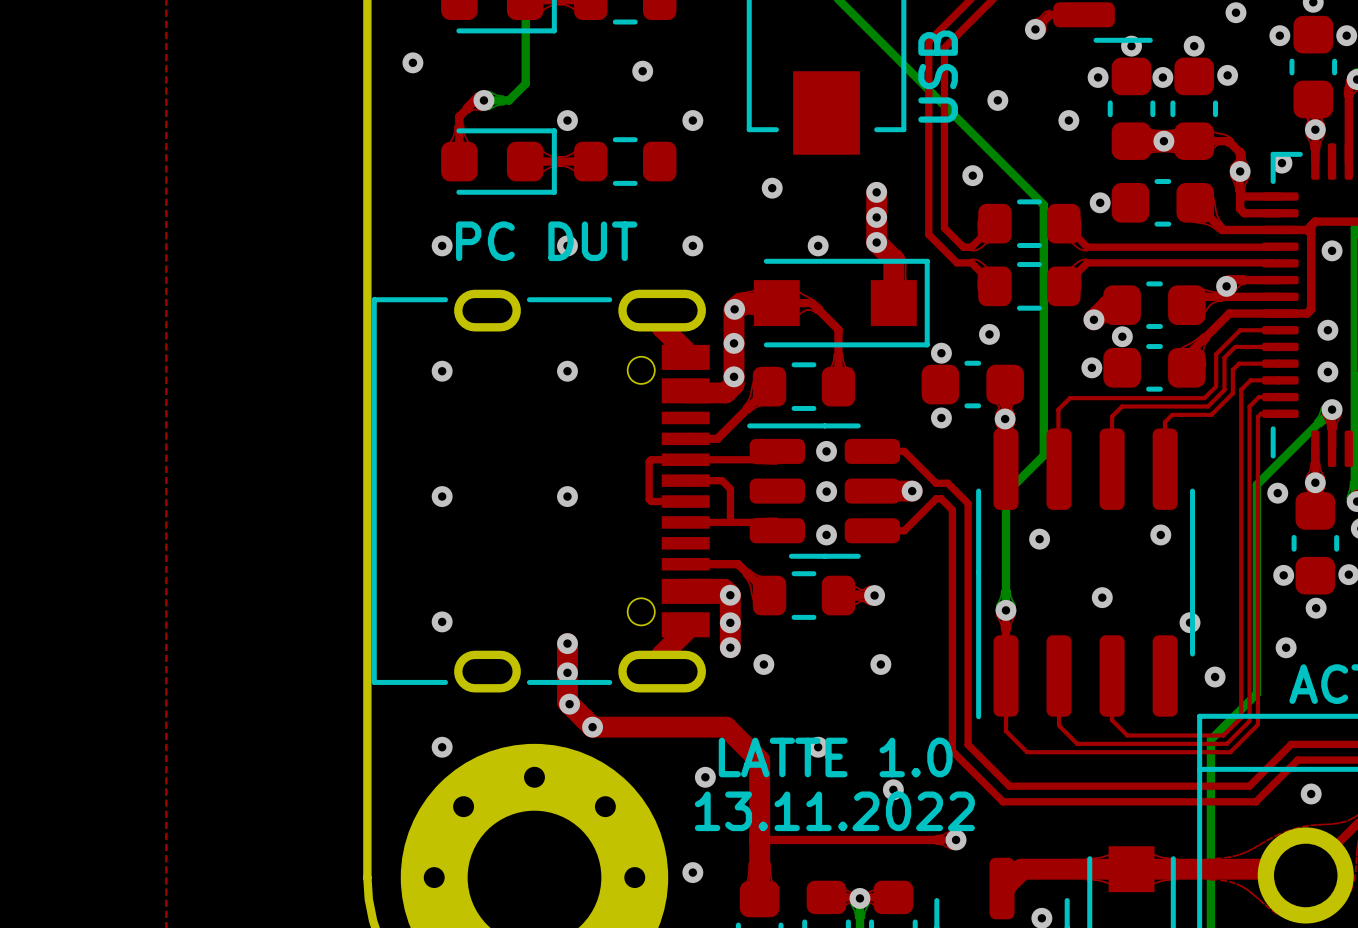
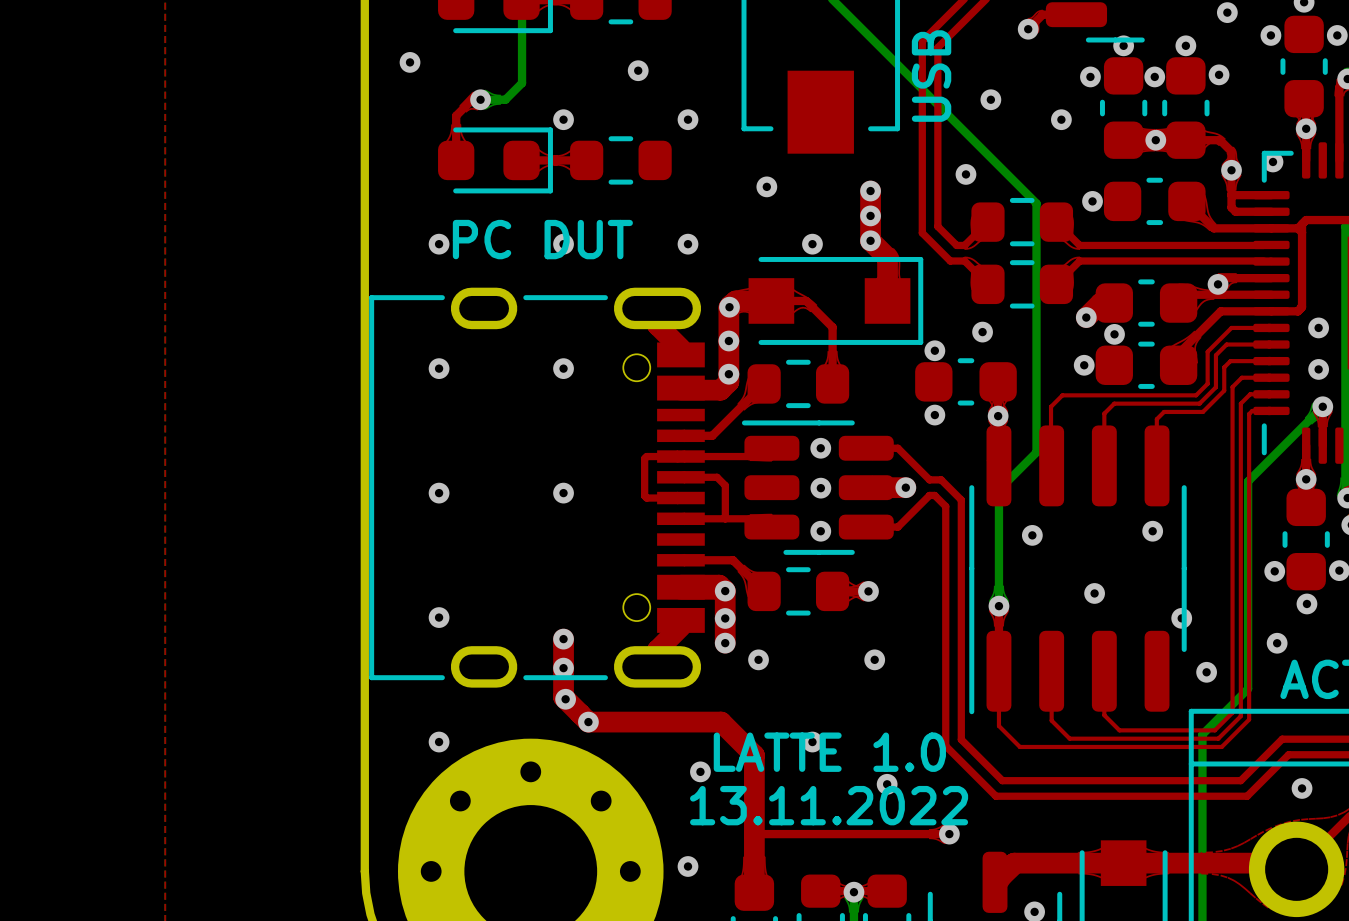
via: (1332, 250) -> none
via: (1277, 493) -> none

